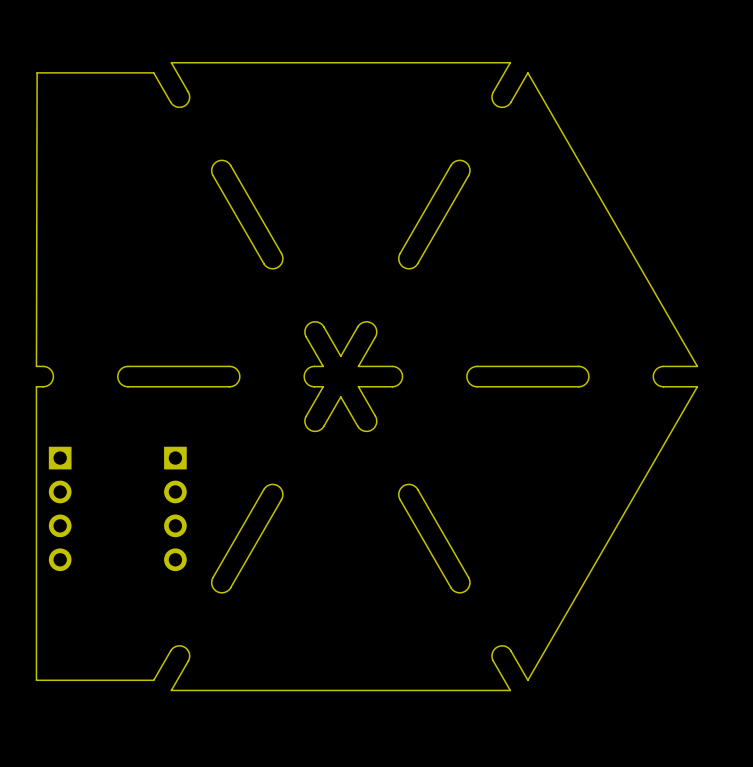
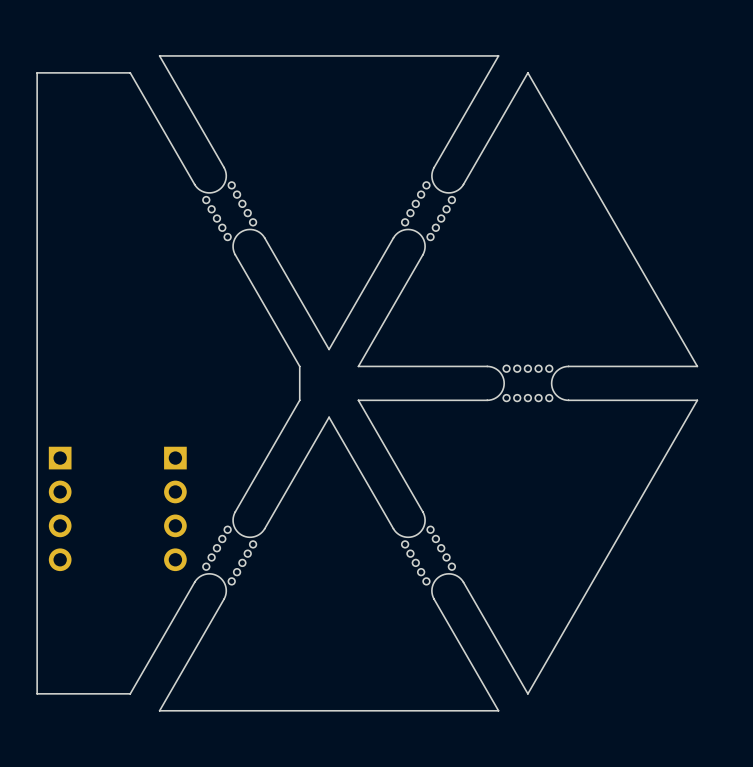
board edge: (37, 72) (36, 366) (47, 367) (53, 376) (47, 385) (36, 386) (36, 680) (153, 680) (171, 649) (178, 645) (188, 650) (188, 661) -> (37, 72) (37, 693) (130, 693) (195, 580) (203, 574) (214, 574) (224, 583) (225, 595) (188, 661)
board edge: (130, 72) (153, 72) (171, 103) (179, 107) (187, 103) (189, 95) (171, 62) (510, 62) (492, 96) (494, 103) (499, 106) (505, 106) (510, 102) -> (130, 72) (195, 186) (202, 191) (210, 192) (217, 190) (223, 185) (226, 177) (224, 169) (159, 55) (498, 55) (432, 171) (433, 183) (442, 191) (454, 192) (463, 184)
board edge: none -> (510, 102) (468, 175)
board edge: (230, 165) (282, 254) (282, 261) (276, 267) (270, 268) (264, 264) (212, 174) (212, 167) (216, 161) (225, 160) (230, 165) -> none
board edge: (468, 175) (469, 168) (465, 162) (458, 160) (452, 163) (400, 253) (399, 261) (403, 267) (412, 268) (417, 263) -> (375, 337) (417, 263)
board edge: (463, 184) (422, 254) -> (264, 528) (257, 535) (245, 536) (235, 529) (233, 517) (299, 400) (299, 366) (234, 253) (233, 245) (235, 237) (241, 231) (249, 229) (257, 231) (263, 236) (329, 349) (396, 234) (408, 229) (418, 232) (424, 242) (422, 254)
part: none -> (229, 211)
part: none -> (428, 211)
board edge: (375, 337) (376, 330) (373, 324) (367, 321) (361, 323) (340, 356) (321, 324) (313, 321) (306, 326) (305, 335) (323, 366) (308, 368) (304, 372) (304, 379) (310, 385) (323, 386) (305, 417) (305, 423) (308, 428) (313, 431) (319, 430) (323, 426) -> none
board edge: (229, 366) (126, 366) (119, 370) (117, 377) (120, 383) (126, 386) (230, 386) (237, 383) (239, 376) (236, 368) (229, 366) -> none
board edge: (392, 366) (398, 368) (402, 373) (401, 380) (397, 385) (358, 386) (376, 418) (376, 424) (372, 429) (365, 431) (359, 428) (340, 396) (329, 417) -> (487, 366) (497, 369) (504, 381) (500, 393) (491, 399) (358, 400) (423, 513) (423, 527) (412, 536) (402, 536) (394, 530) (329, 417)
board edge: none -> (477, 366) (392, 366)
board edge: (568, 366) (487, 366) -> none
board edge: (578, 366) (585, 368) (588, 376) (585, 384) (578, 386) (474, 386) (469, 382) (466, 375) (469, 369) (477, 366) -> (578, 366) (663, 366)
board edge: (663, 366) (657, 368) (653, 373) (654, 380) (658, 385) (697, 386) (527, 680) (510, 649) (501, 645) (494, 649) (492, 657) (510, 690) (171, 690) -> (568, 366) (557, 370) (551, 381) (554, 393) (564, 399) (697, 400) (527, 693) (463, 582) (457, 576) (448, 573) (440, 576) (435, 580) (432, 588) (433, 597) (498, 710) (159, 710) (171, 690)
part: none -> (527, 383)
board edge: (417, 489) (469, 578) (468, 587) (463, 592) (456, 592) (451, 588) (399, 498) (399, 491) (403, 485) (410, 484) (417, 489) -> none
board edge: (281, 499) (282, 493) (278, 486) (271, 484) (264, 488) (212, 578) (212, 585) (215, 590) (223, 592) (230, 588) (264, 528) -> (281, 499) (323, 426)
part: none -> (229, 555)
part: none -> (428, 555)

